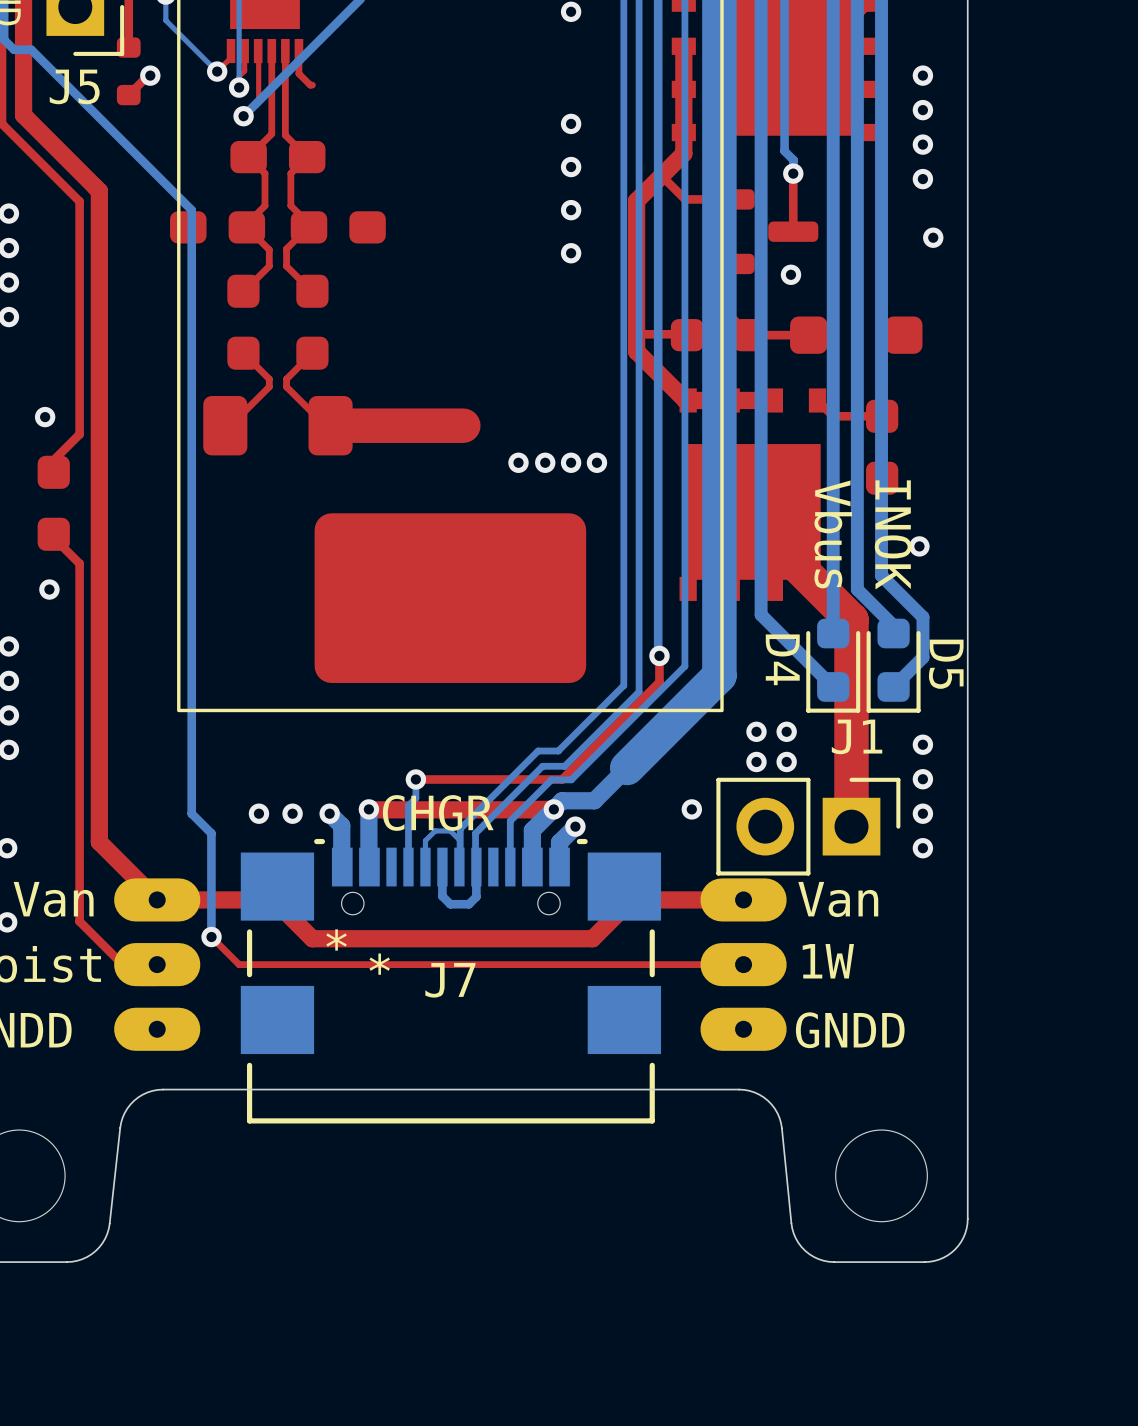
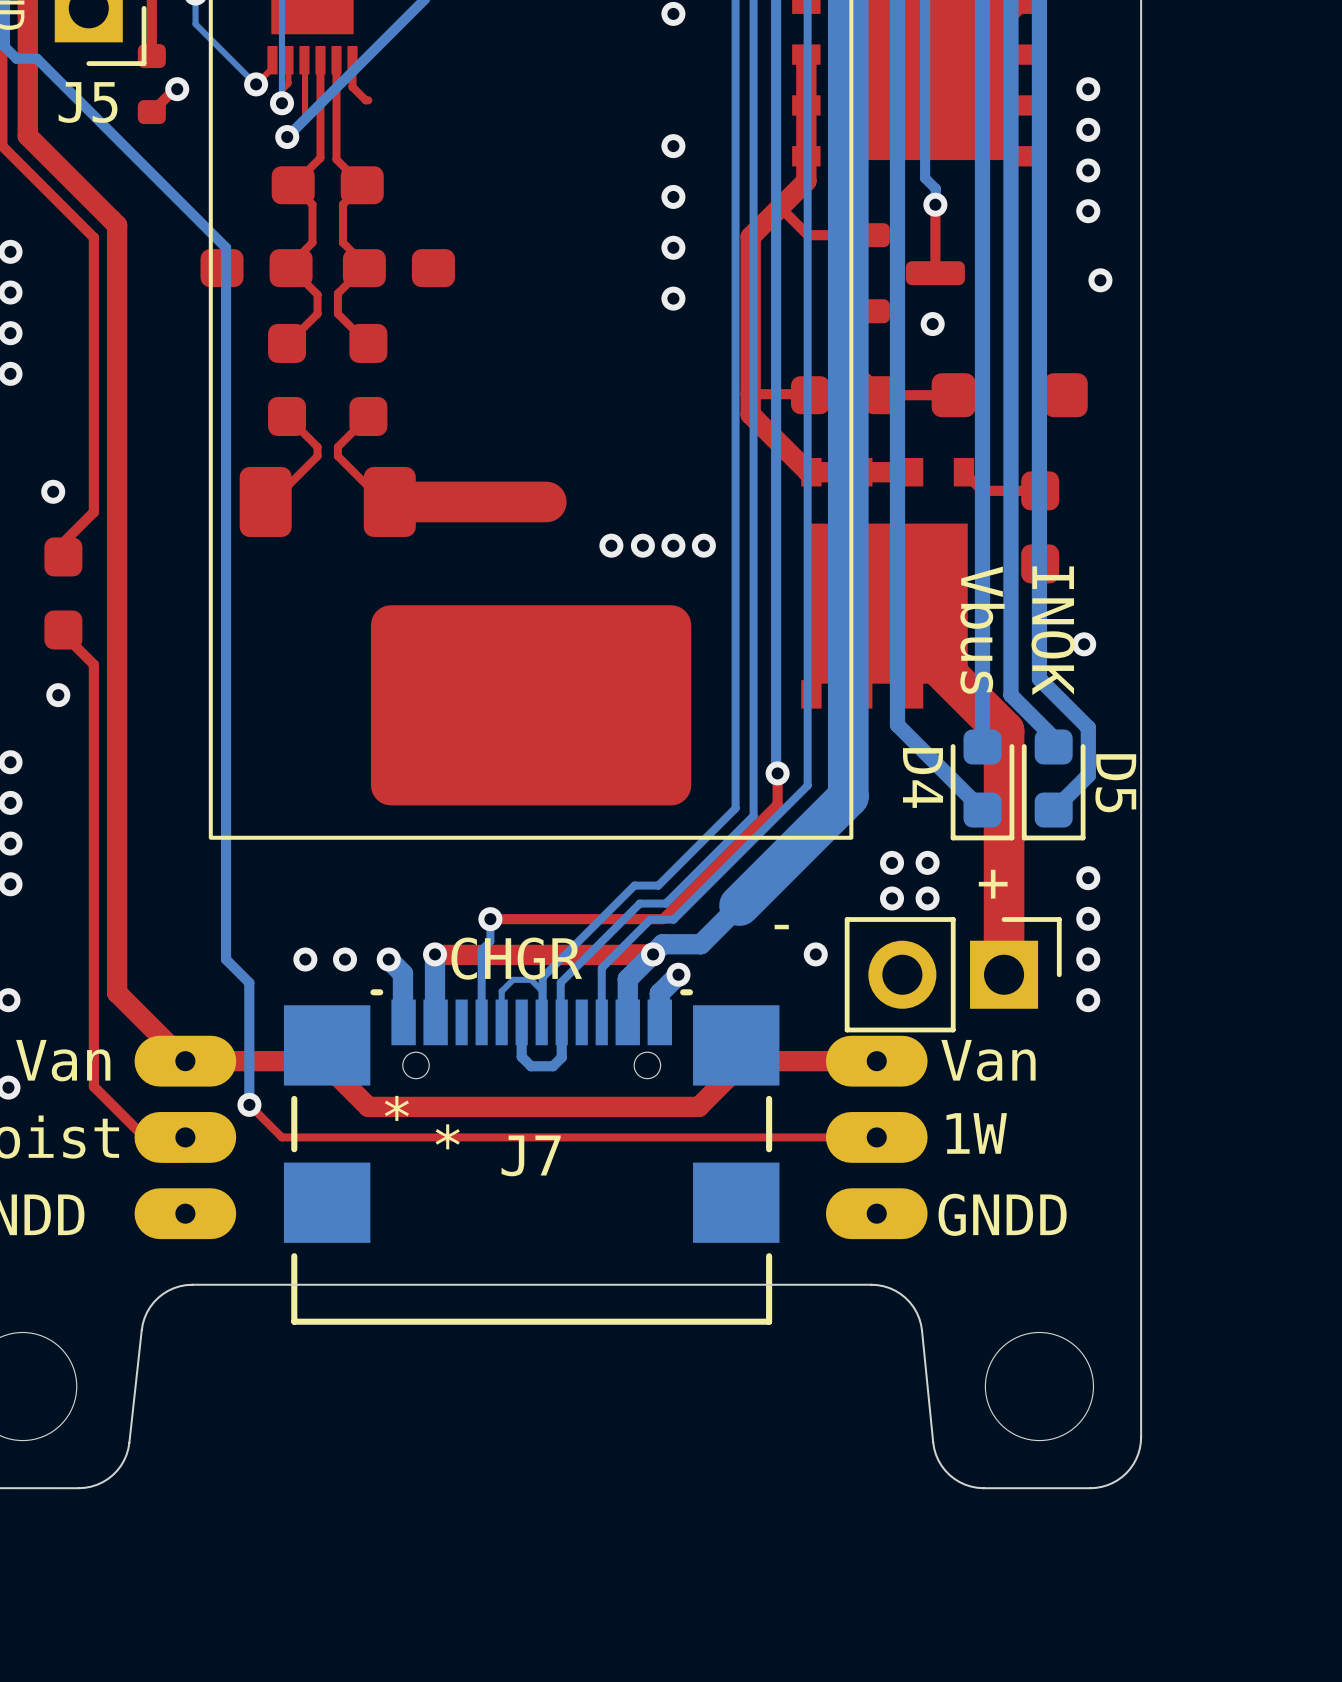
J1 name: J1 (857, 736) -> none
text: none -> + (993, 884)
text: none -> - (781, 927)

